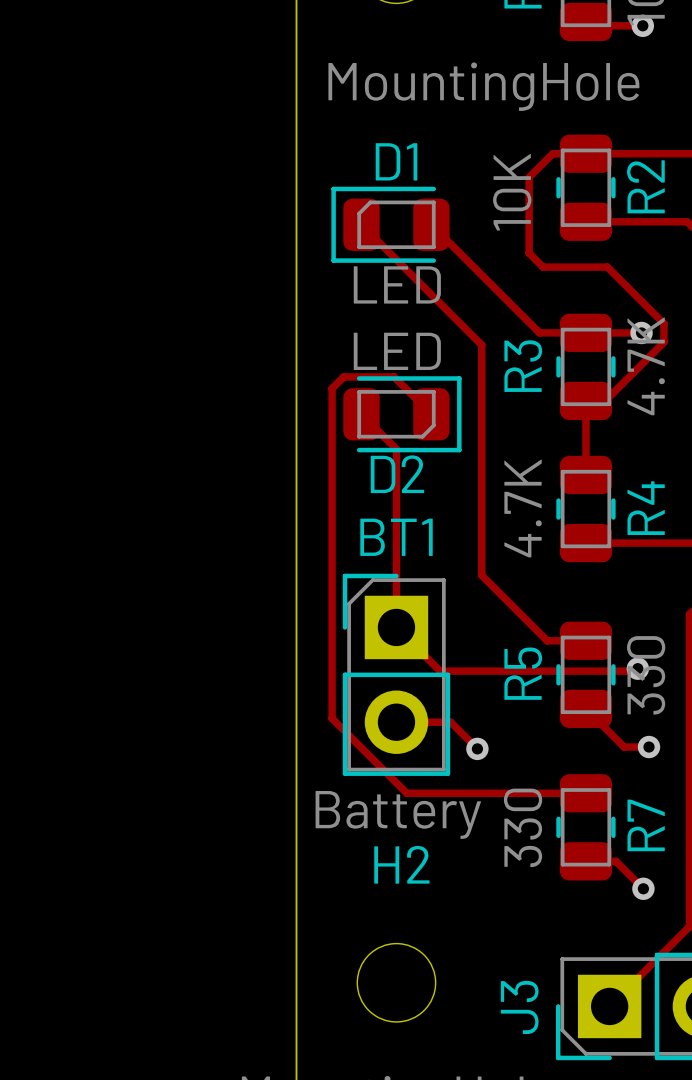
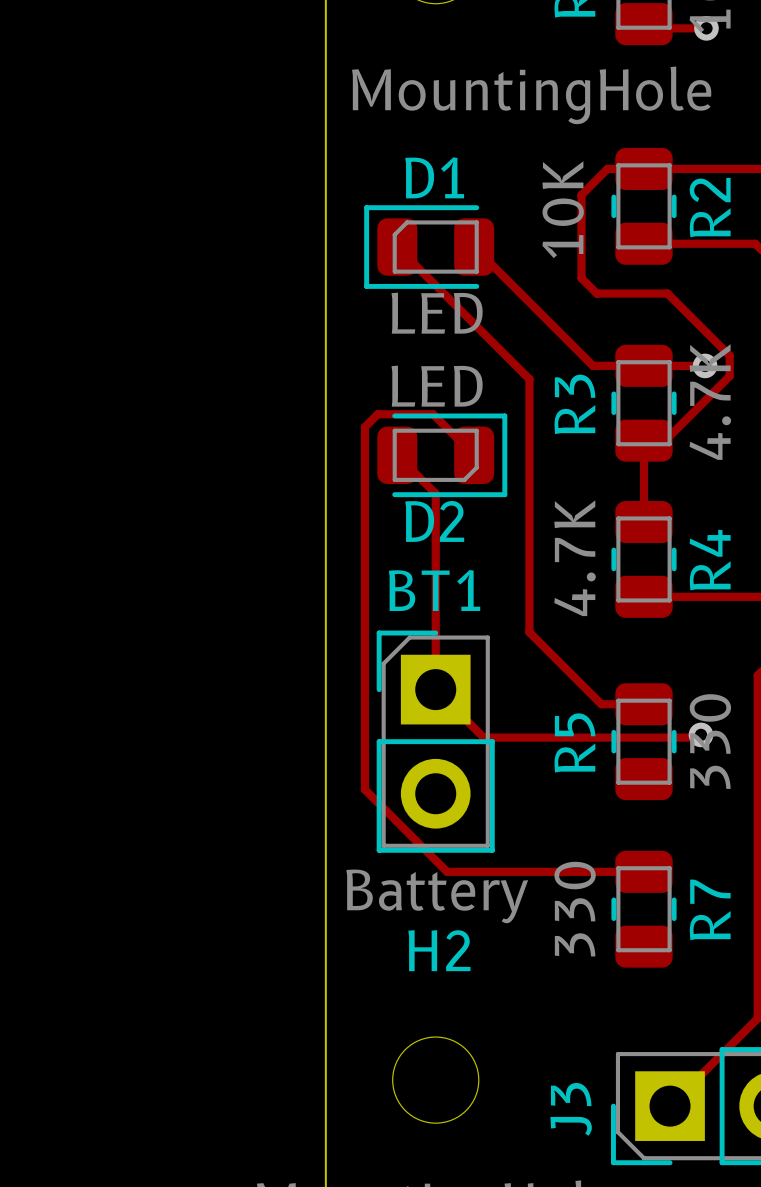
track: (585, 708) (624, 747) (649, 747) -> none
track: (396, 722) (450, 722) (477, 748) -> none
via: (649, 747) -> none
via: (477, 748) -> none
track: (585, 861) (616, 861) (643, 888) -> none
via: (643, 888) -> none

